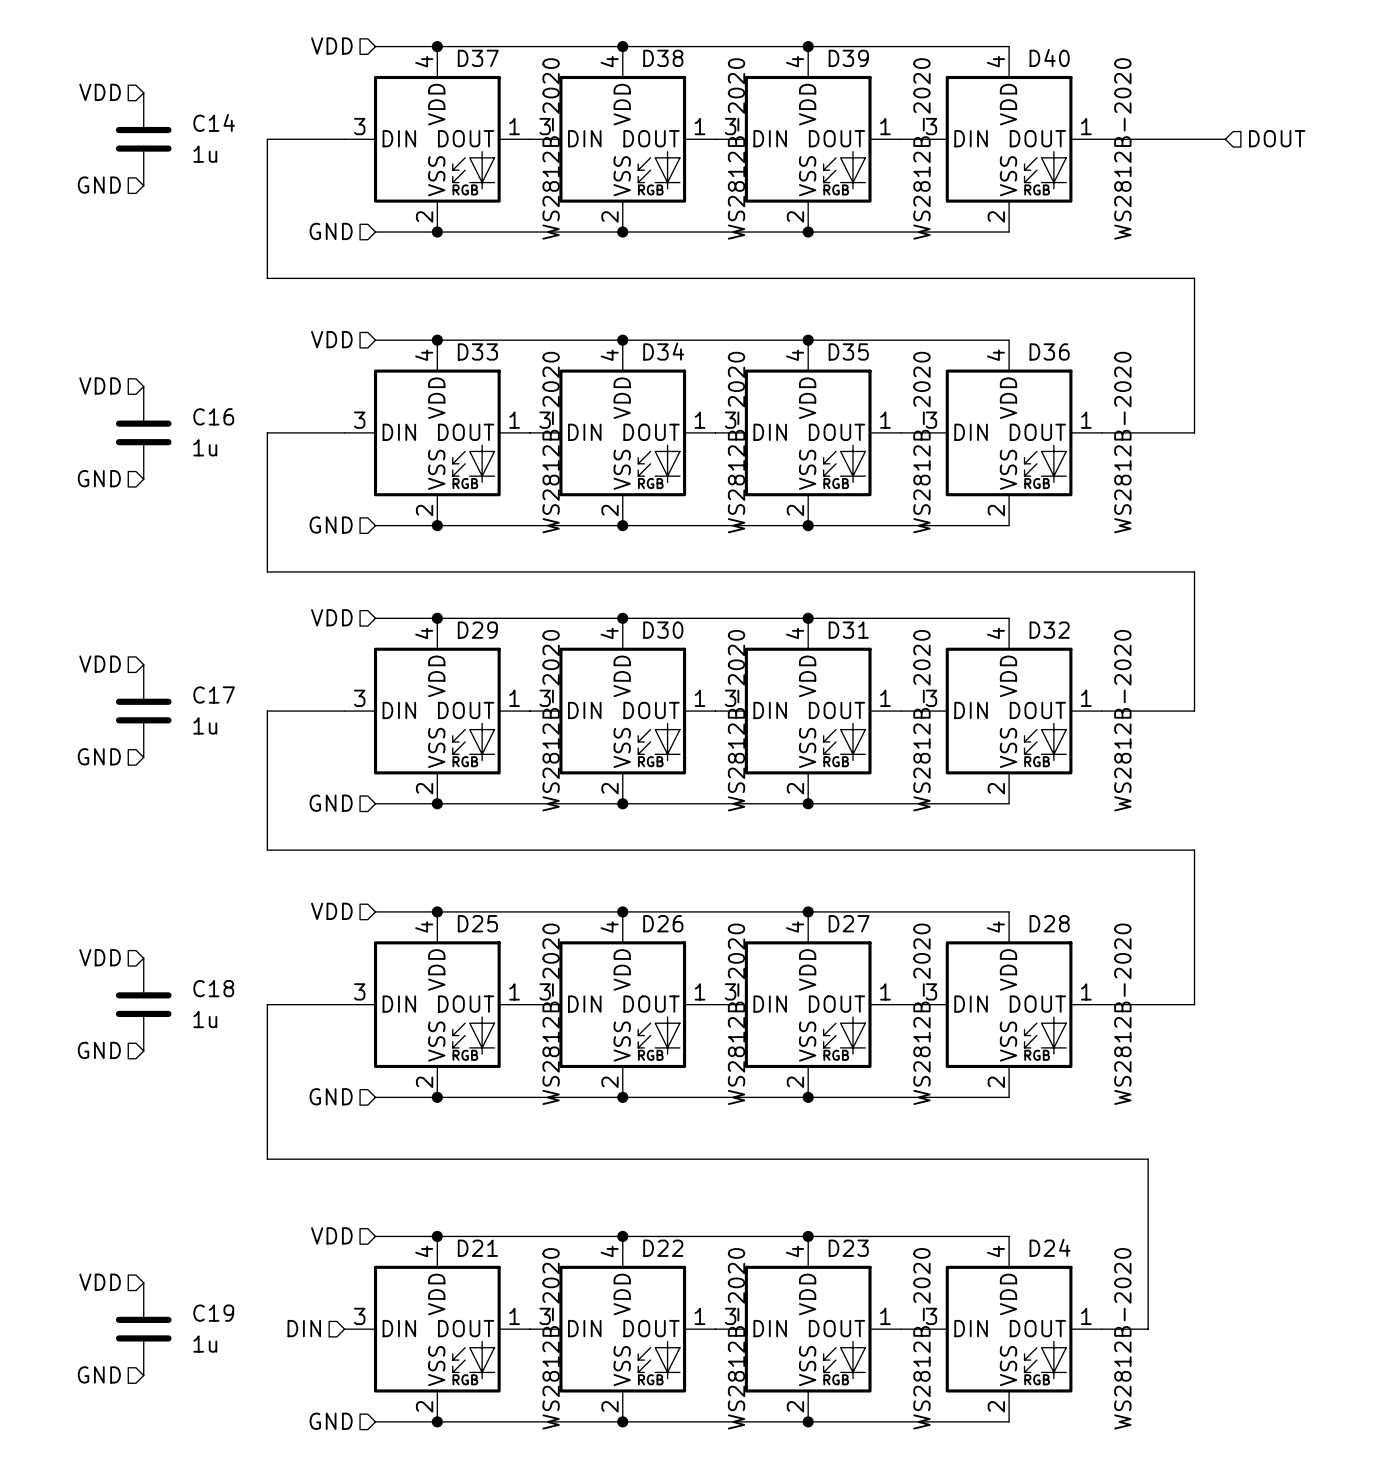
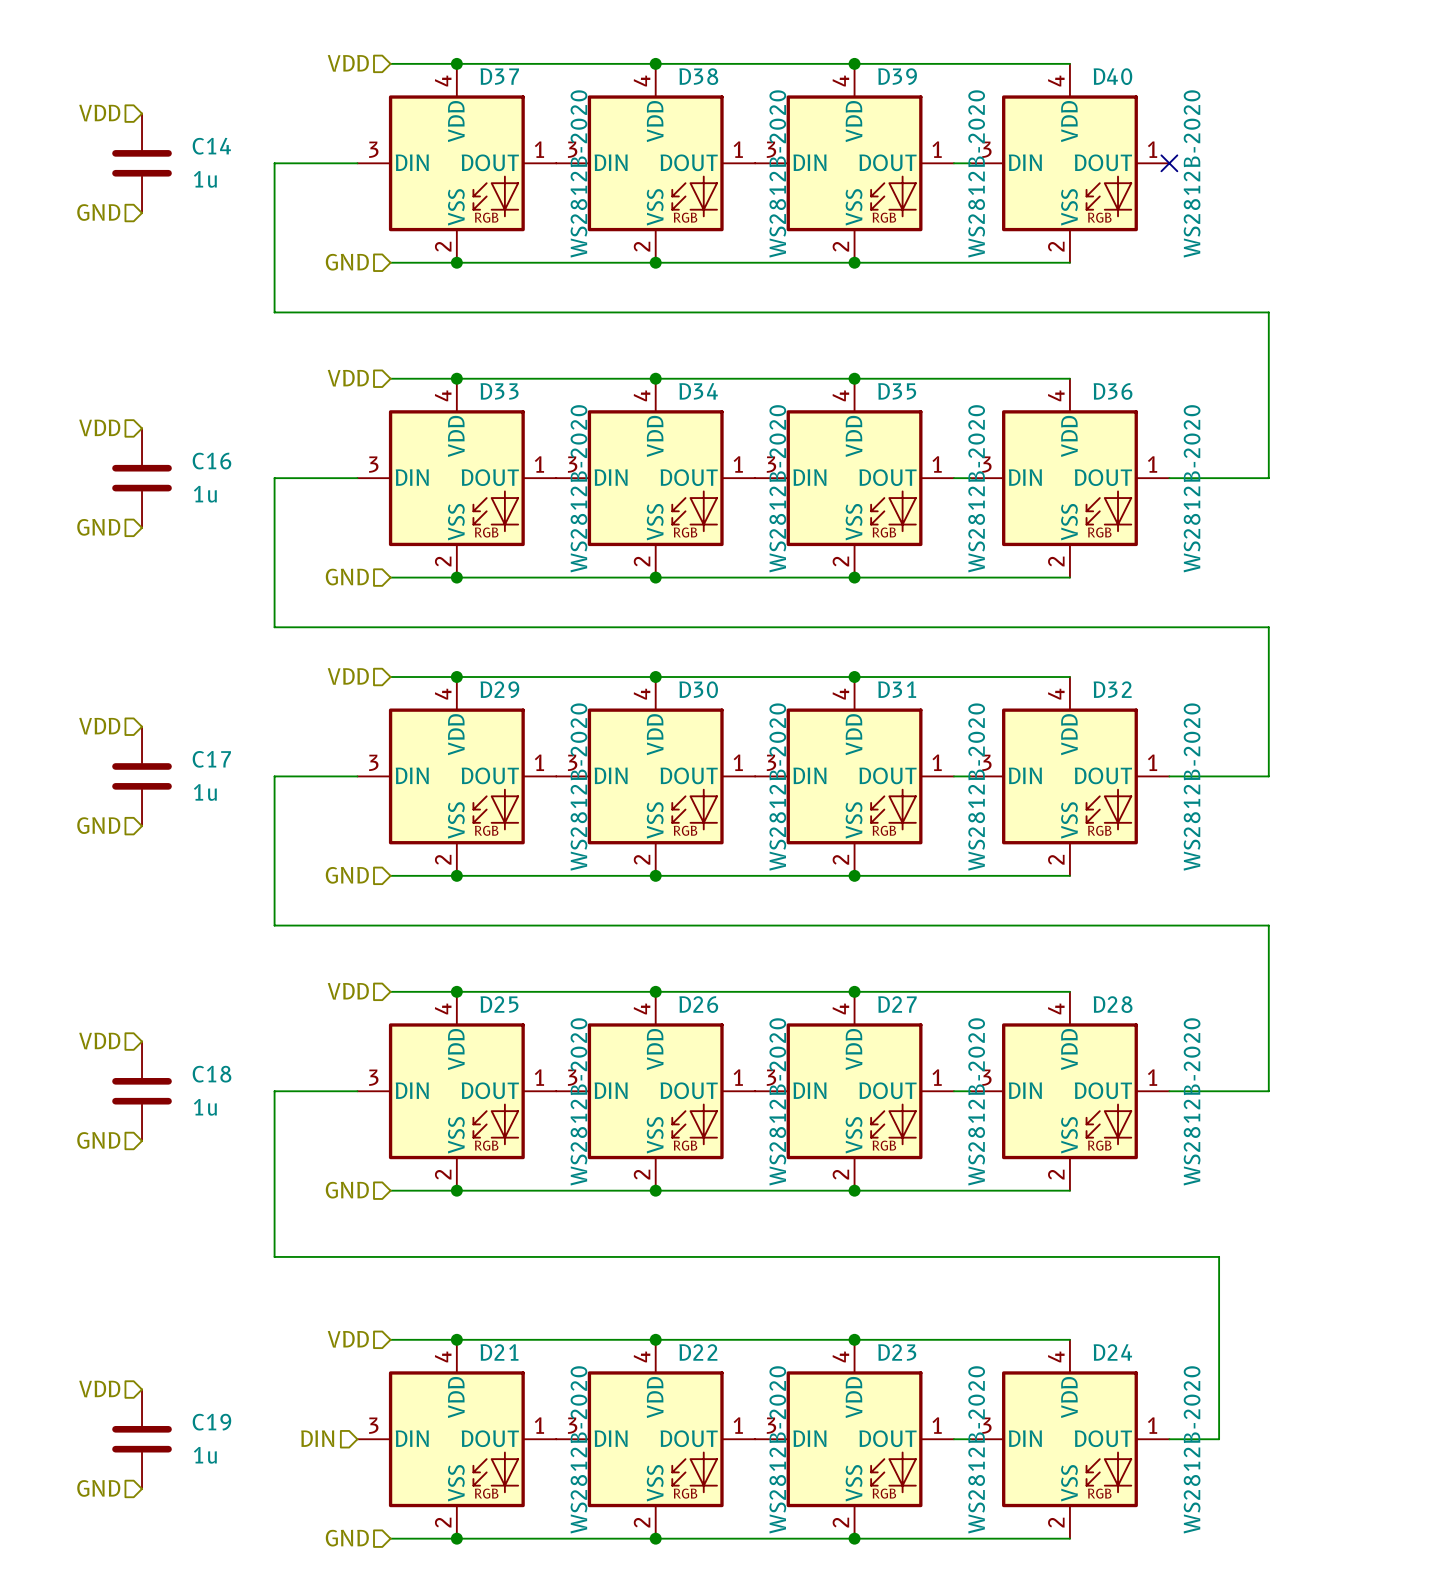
hierarchical label: DOUT (1277, 138) -> none
wire: (1101, 139) (1225, 139) -> none
no-connect mark: none -> (1169, 163)

